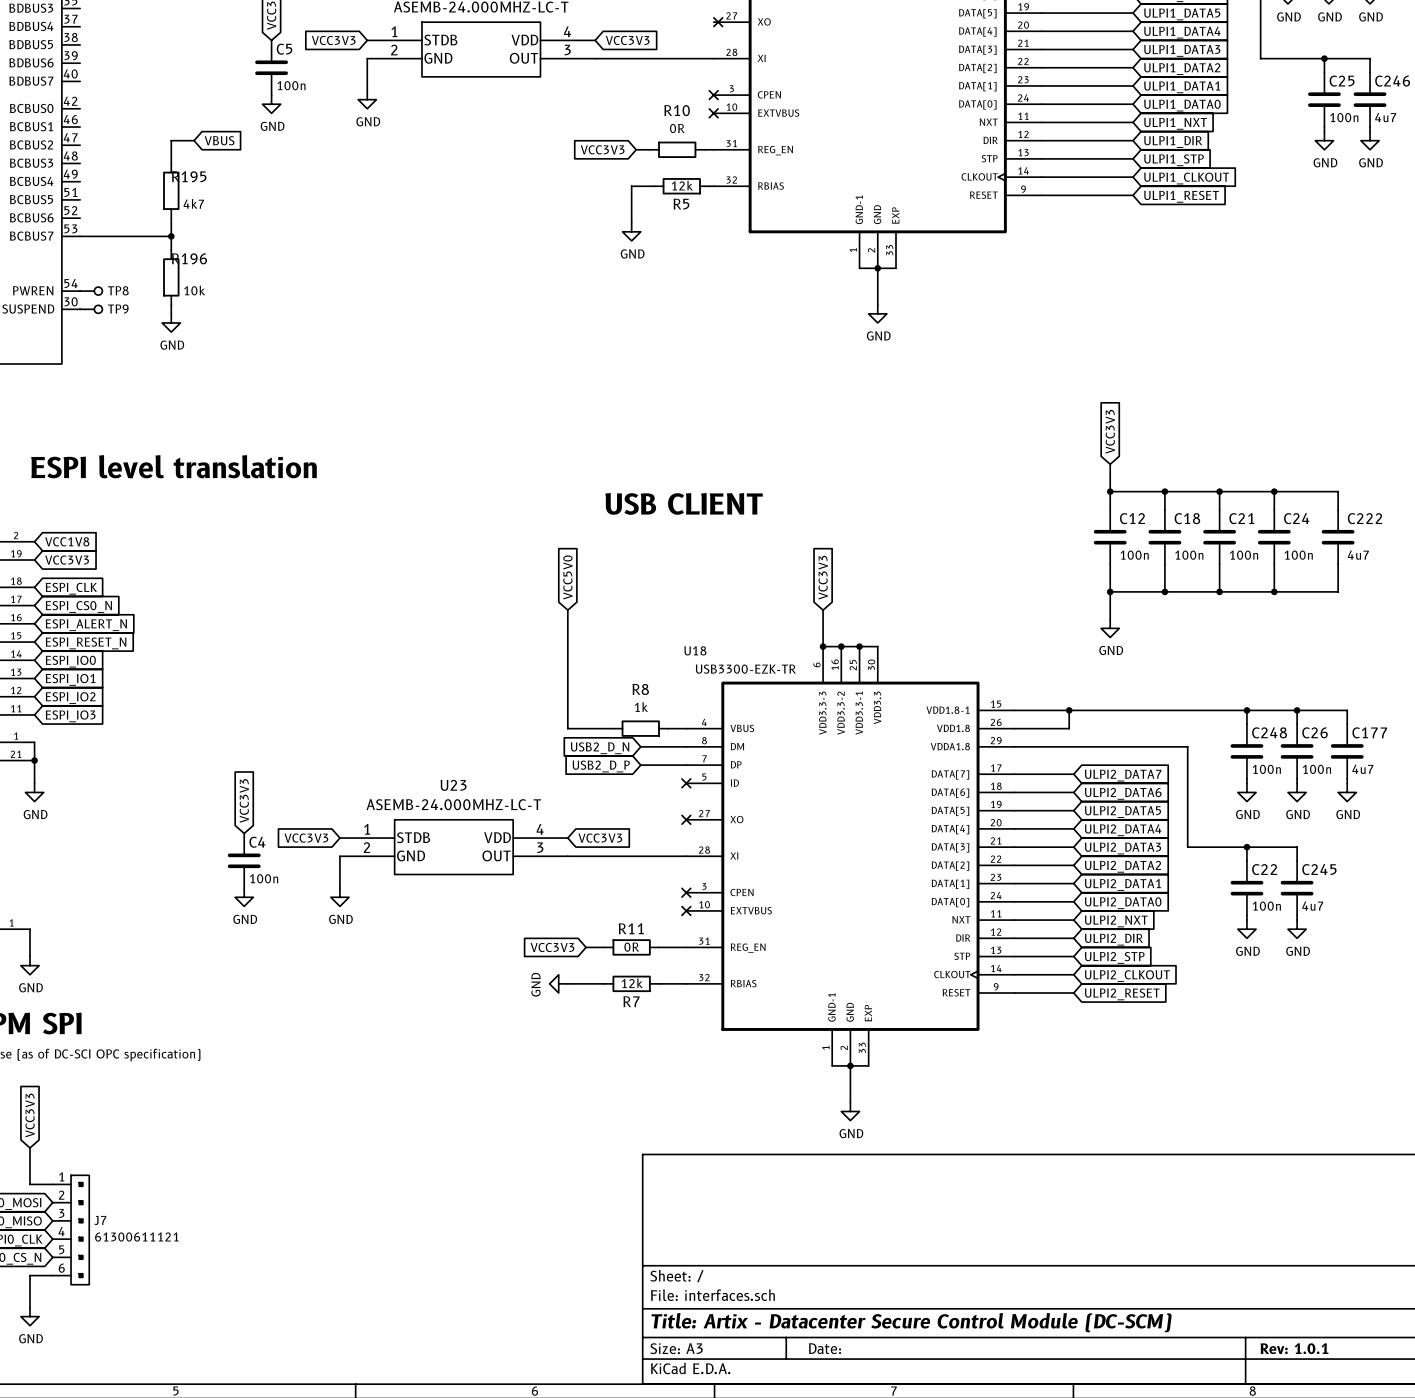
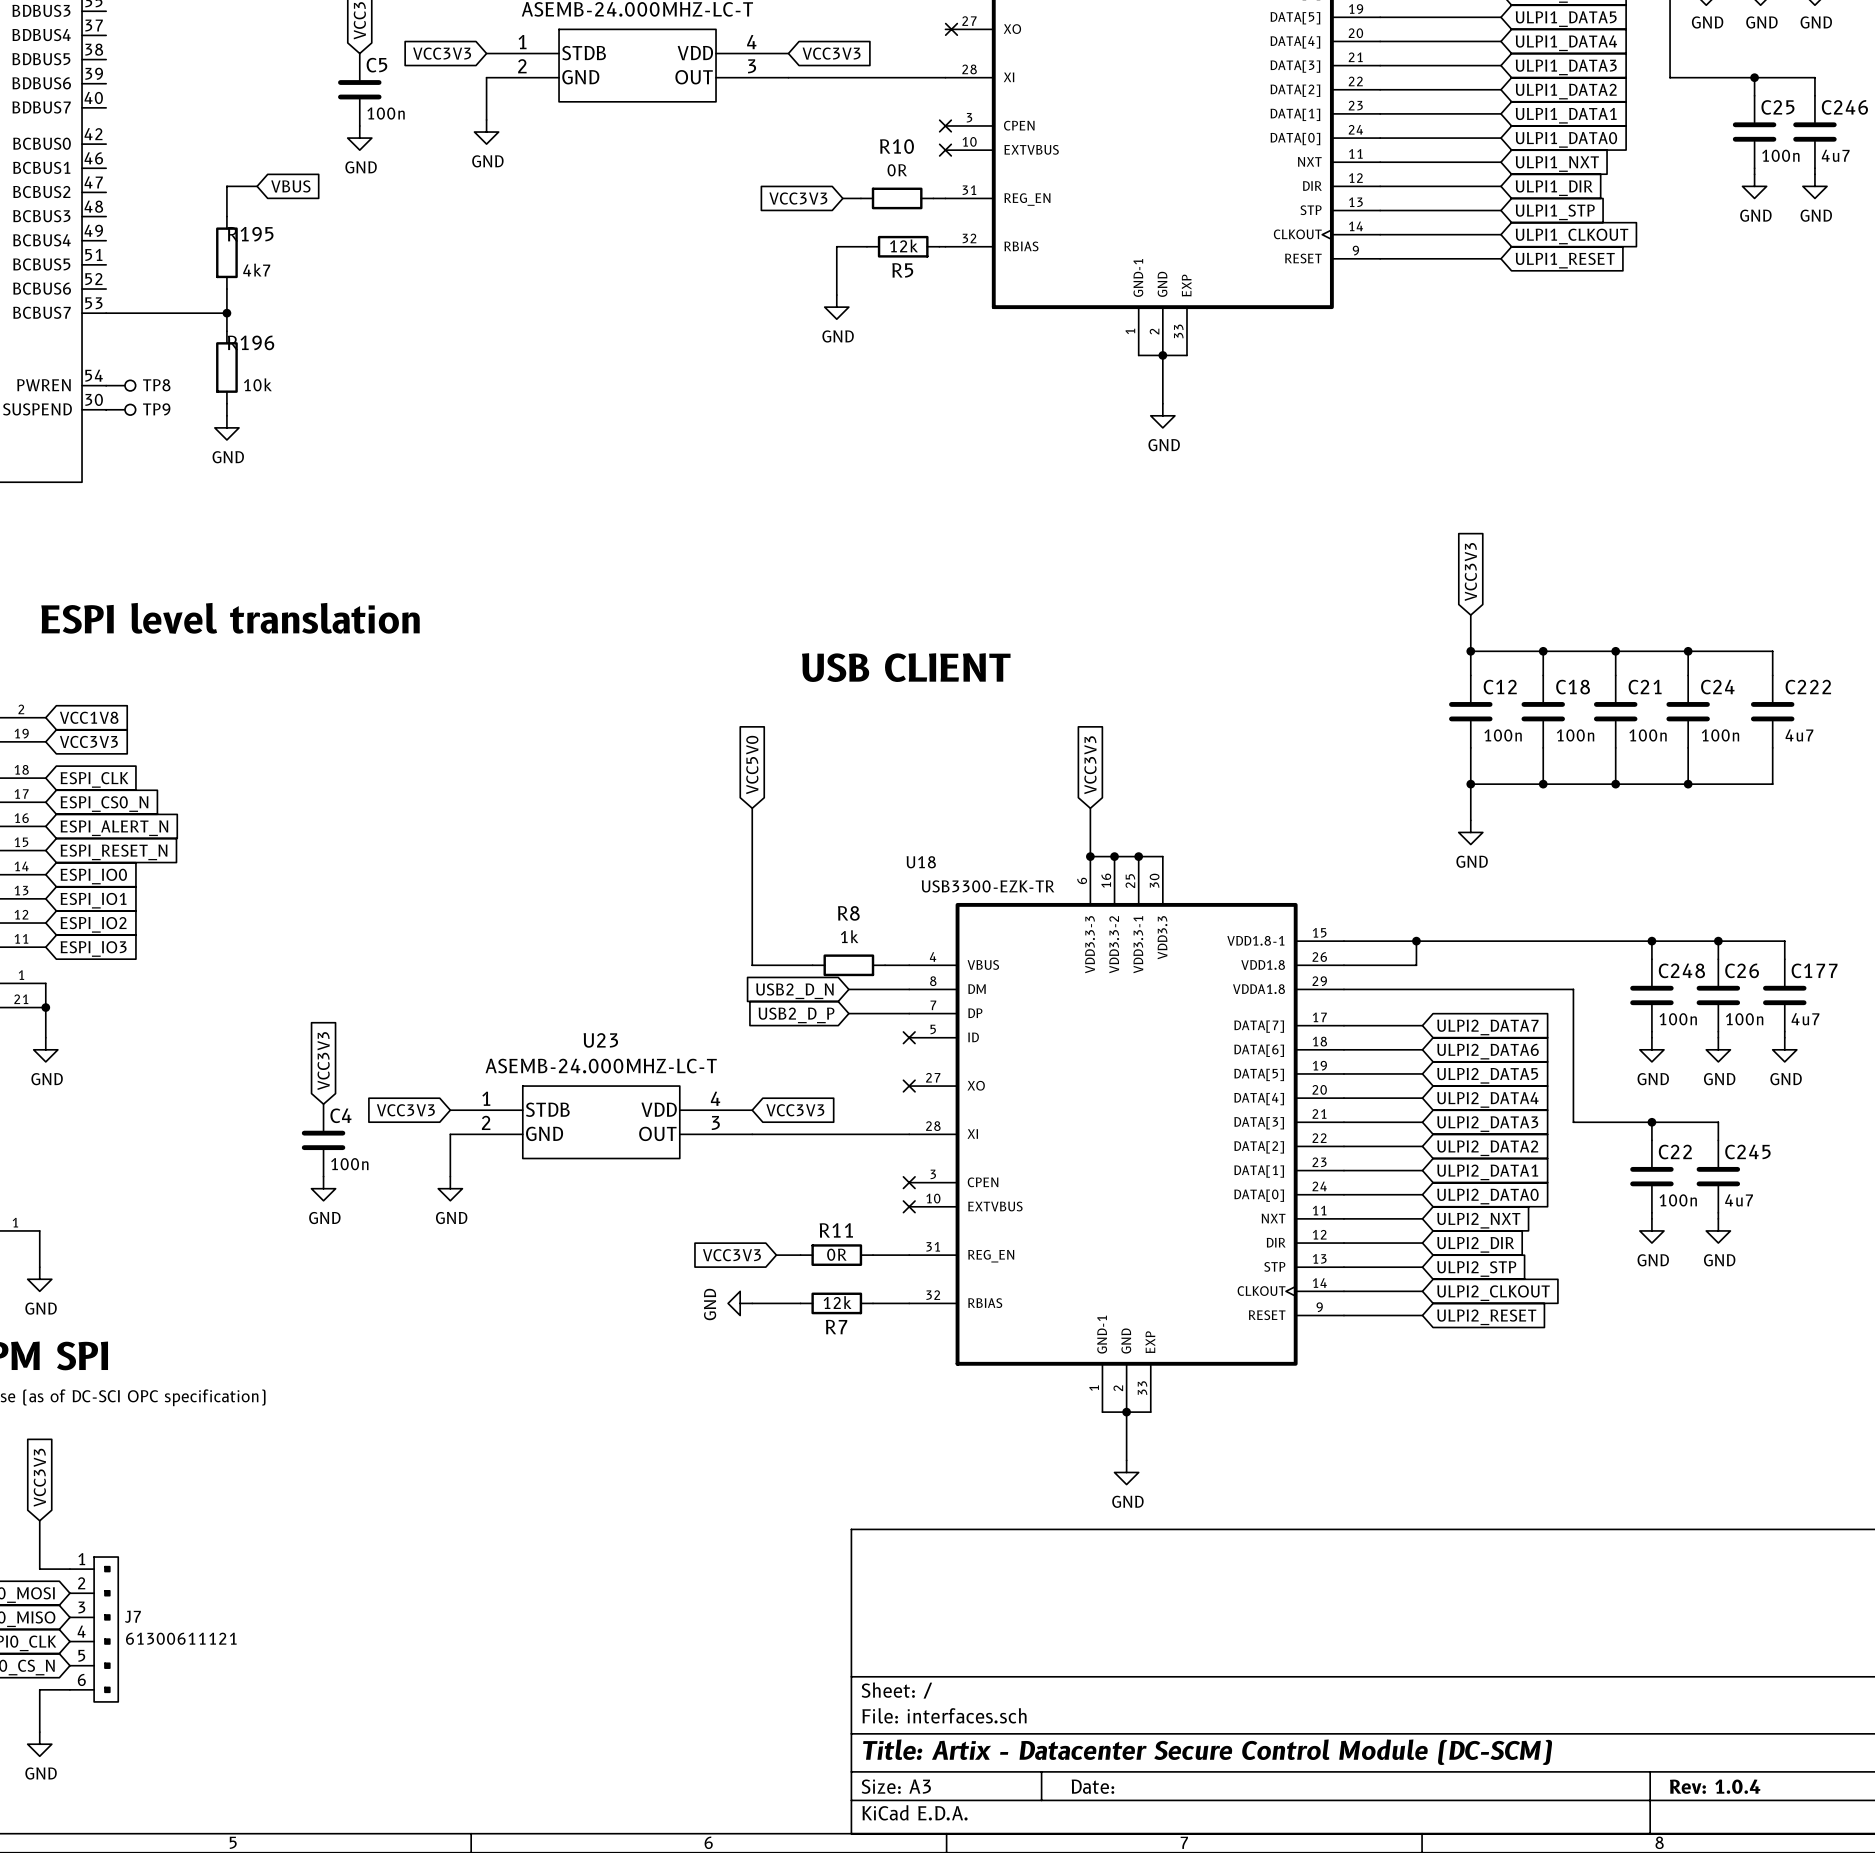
title block: Rev: 1.0.1 (1294, 1348) -> Rev: 1.0.4 (1715, 1786)

